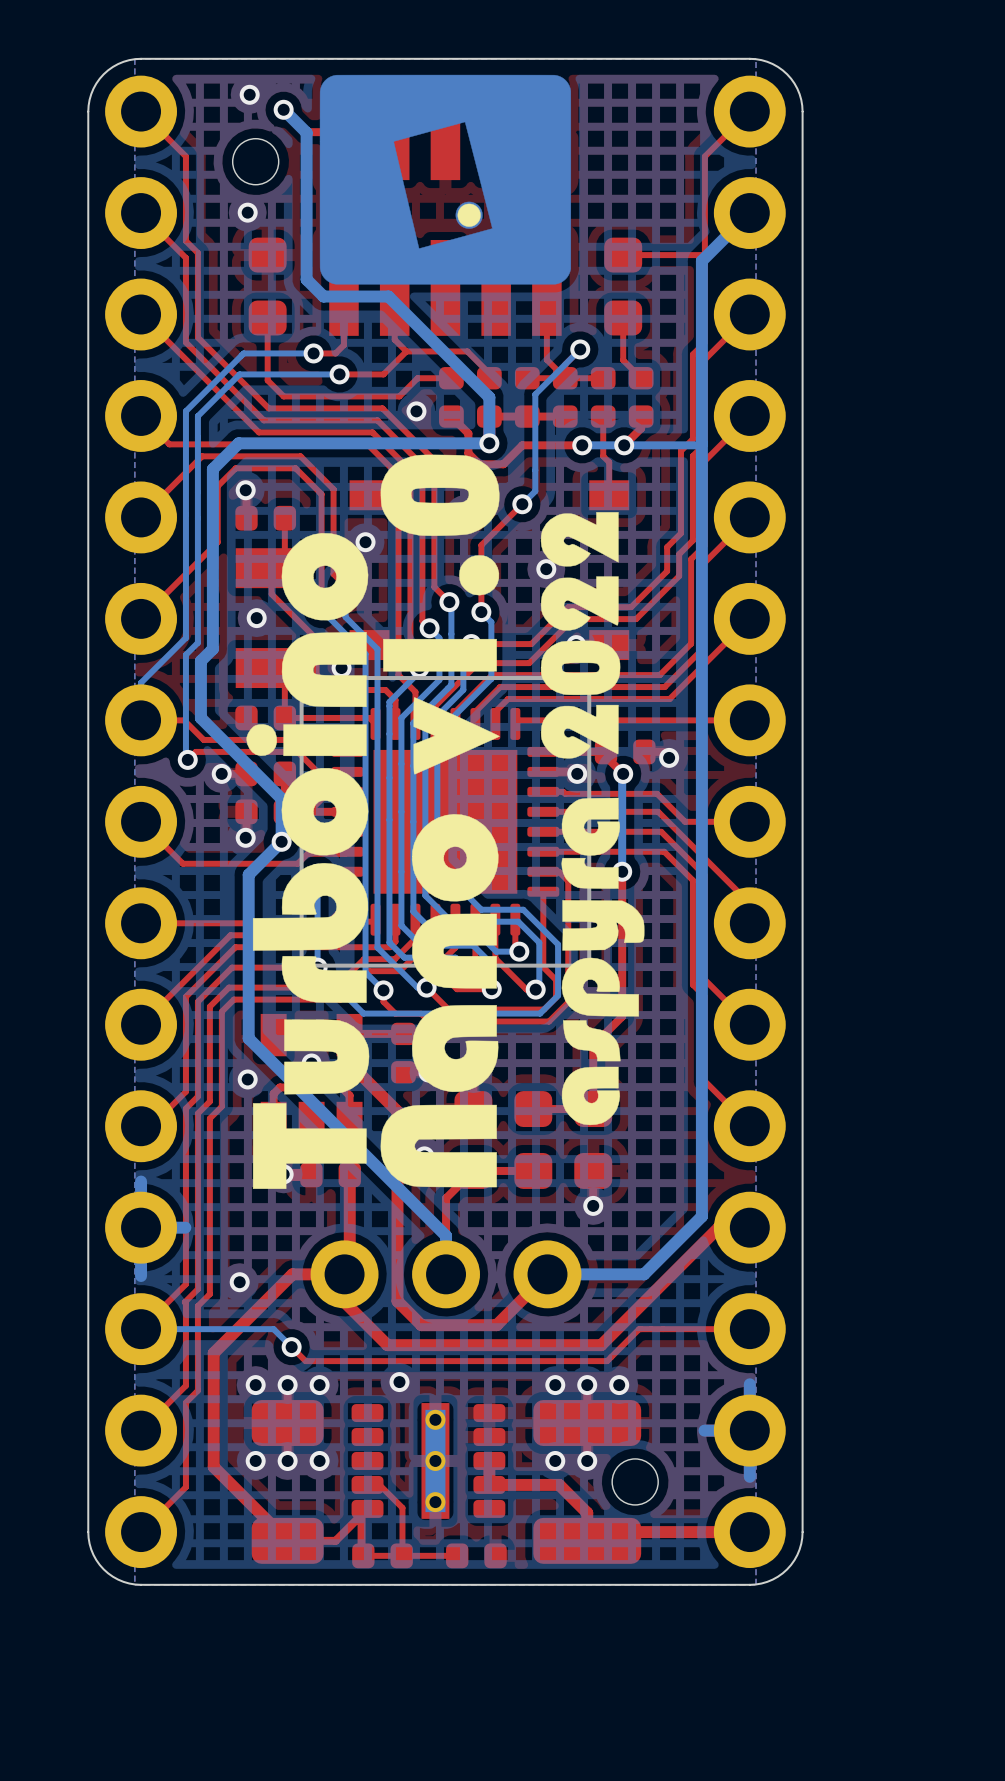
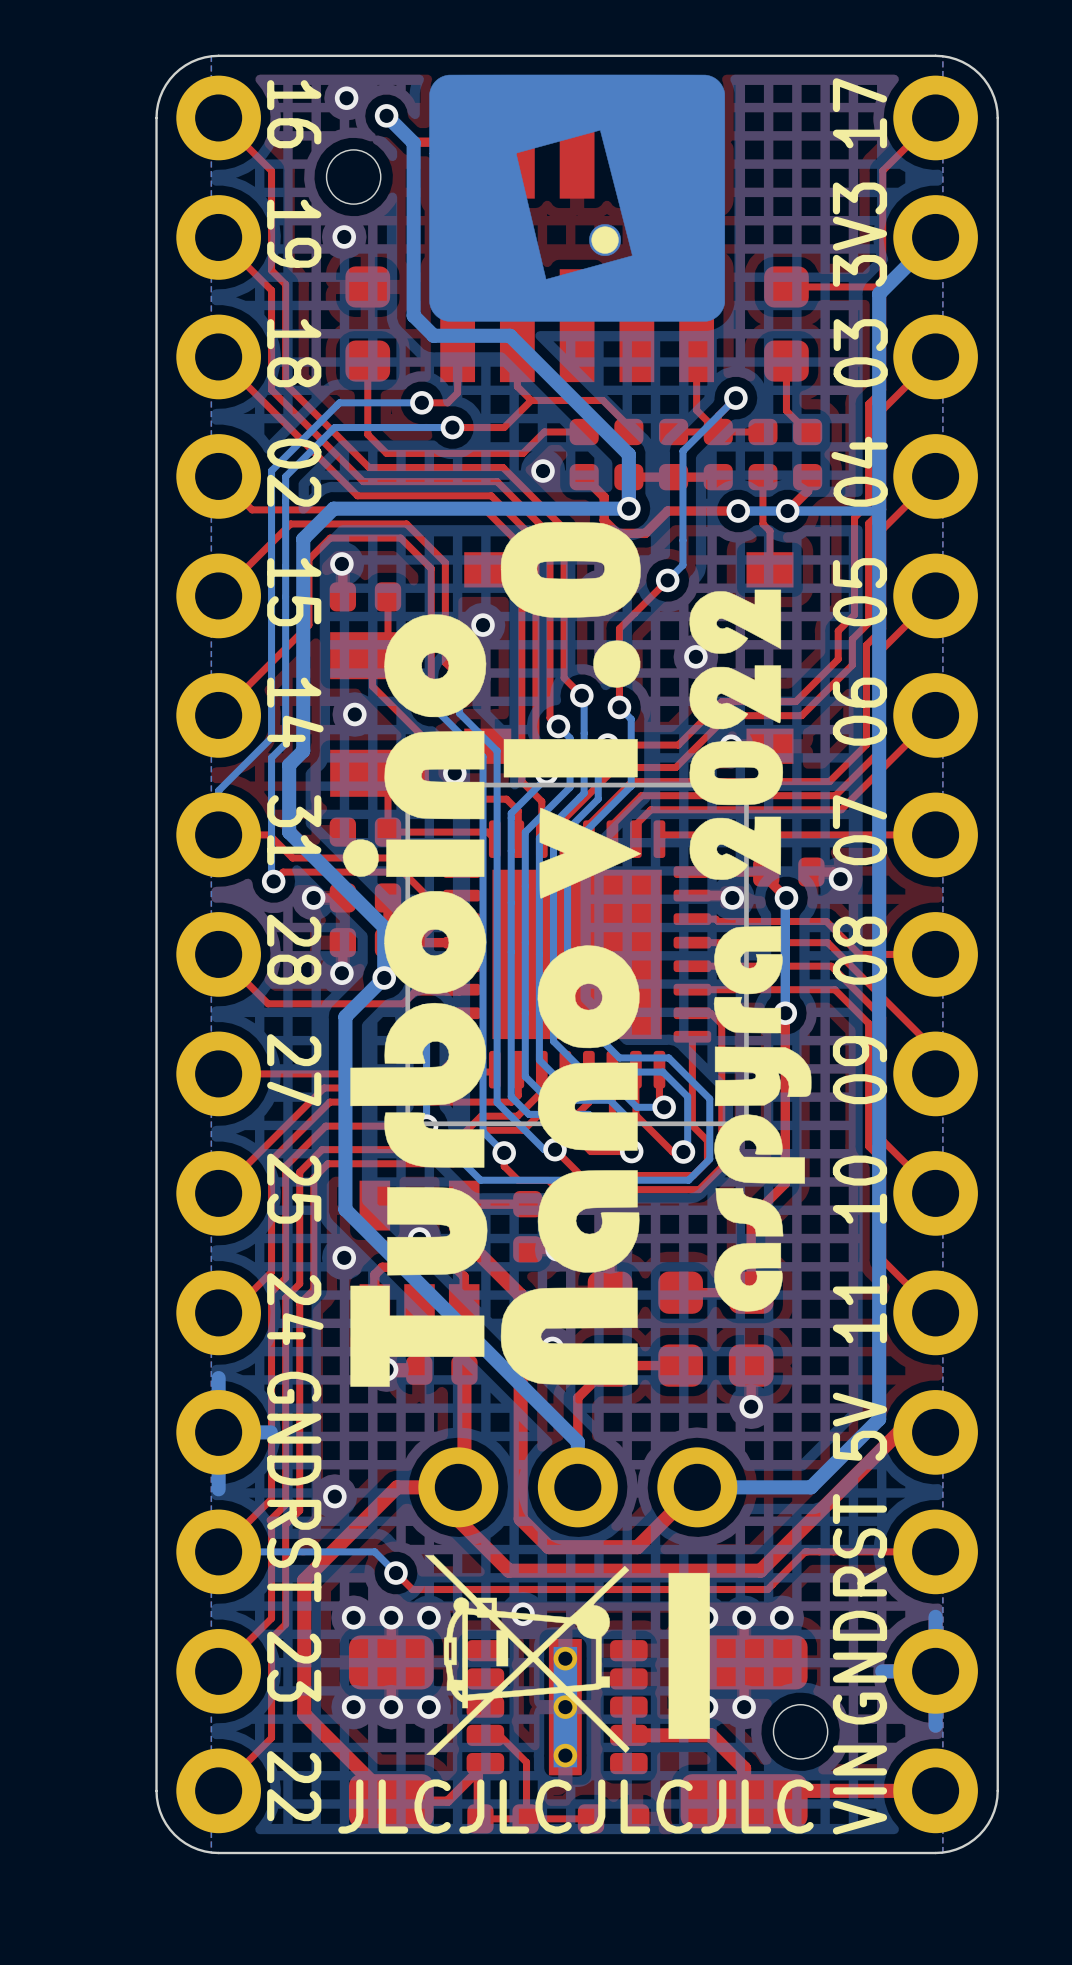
drawing: none -> [425, 1555, 710, 1755]
text: none -> JLCJLCJLCJLC (576, 1806)

